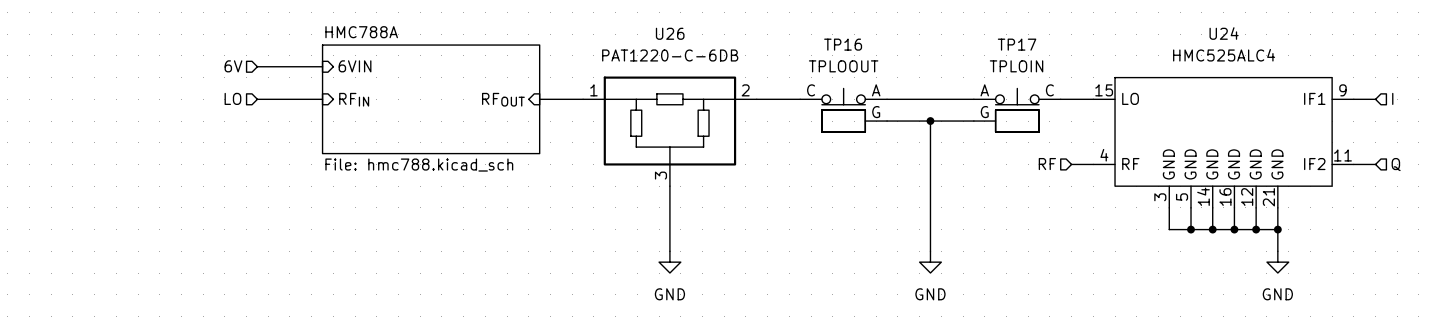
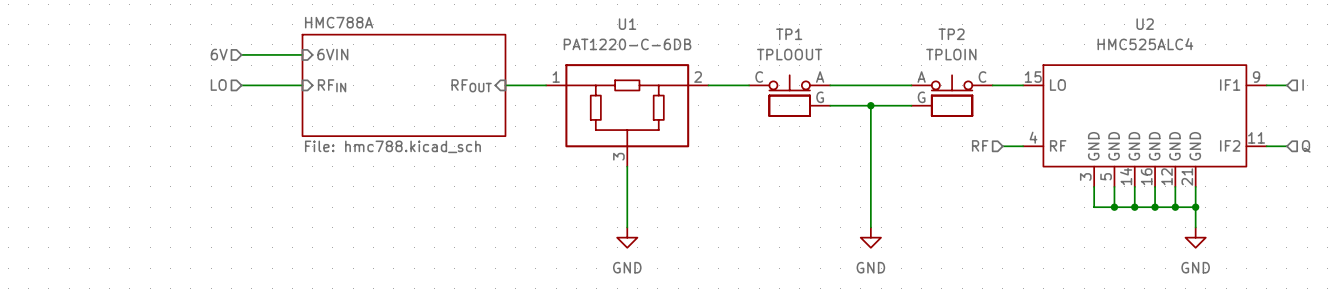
U26 name: U26 (670, 33) -> U1 (627, 24)
U24 name: U24 (1224, 33) -> U2 (1145, 24)
TP16 name: TP16 (843, 44) -> TP1 (789, 34)
TP17 name: TP17 (1017, 44) -> TP2 (951, 34)

